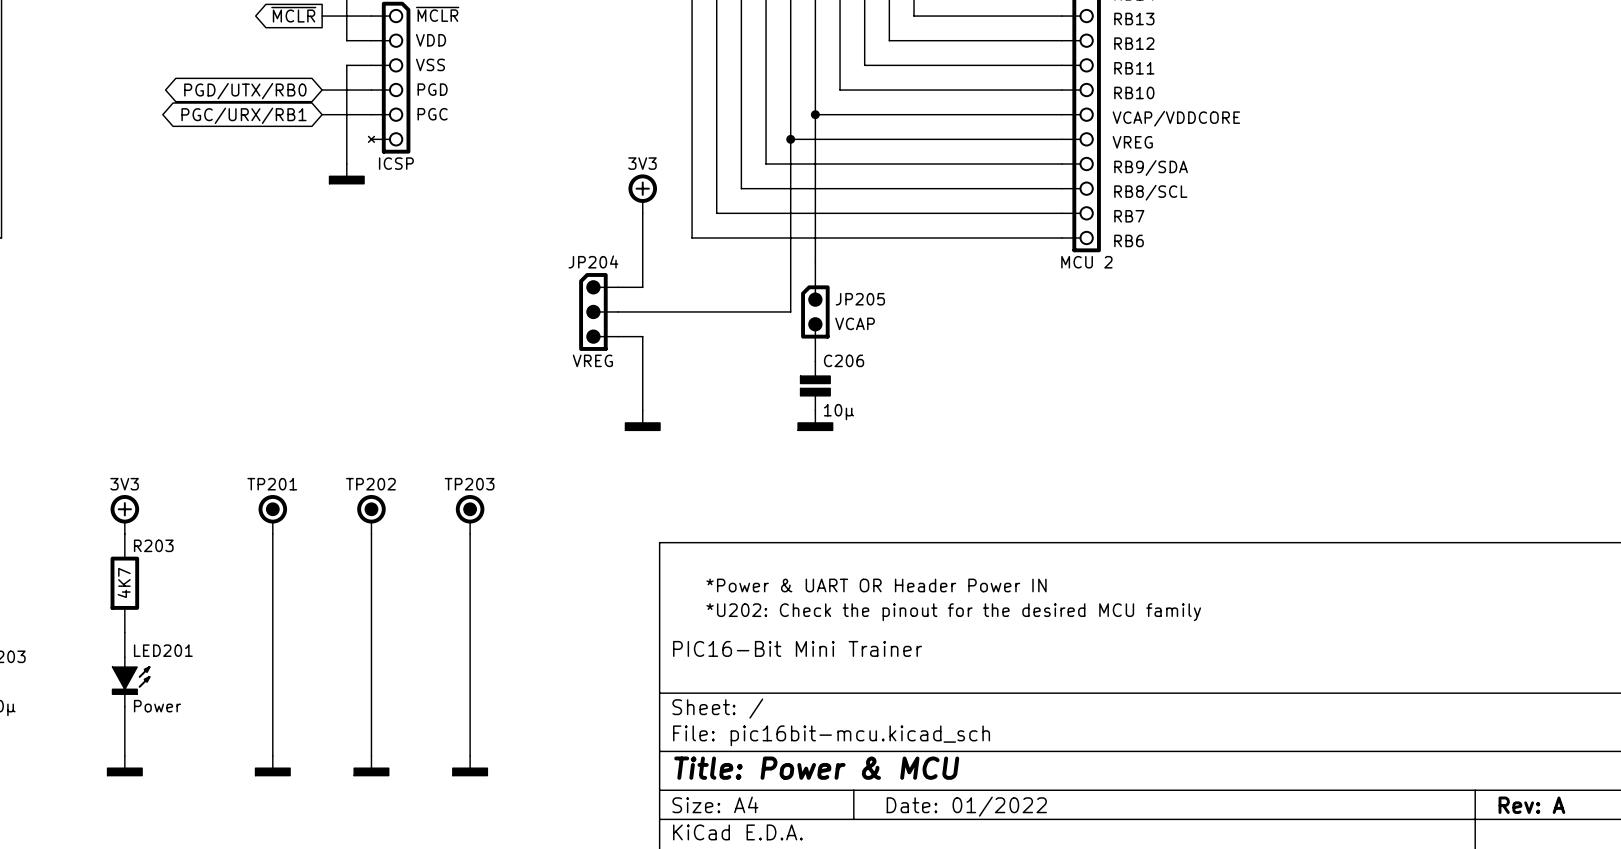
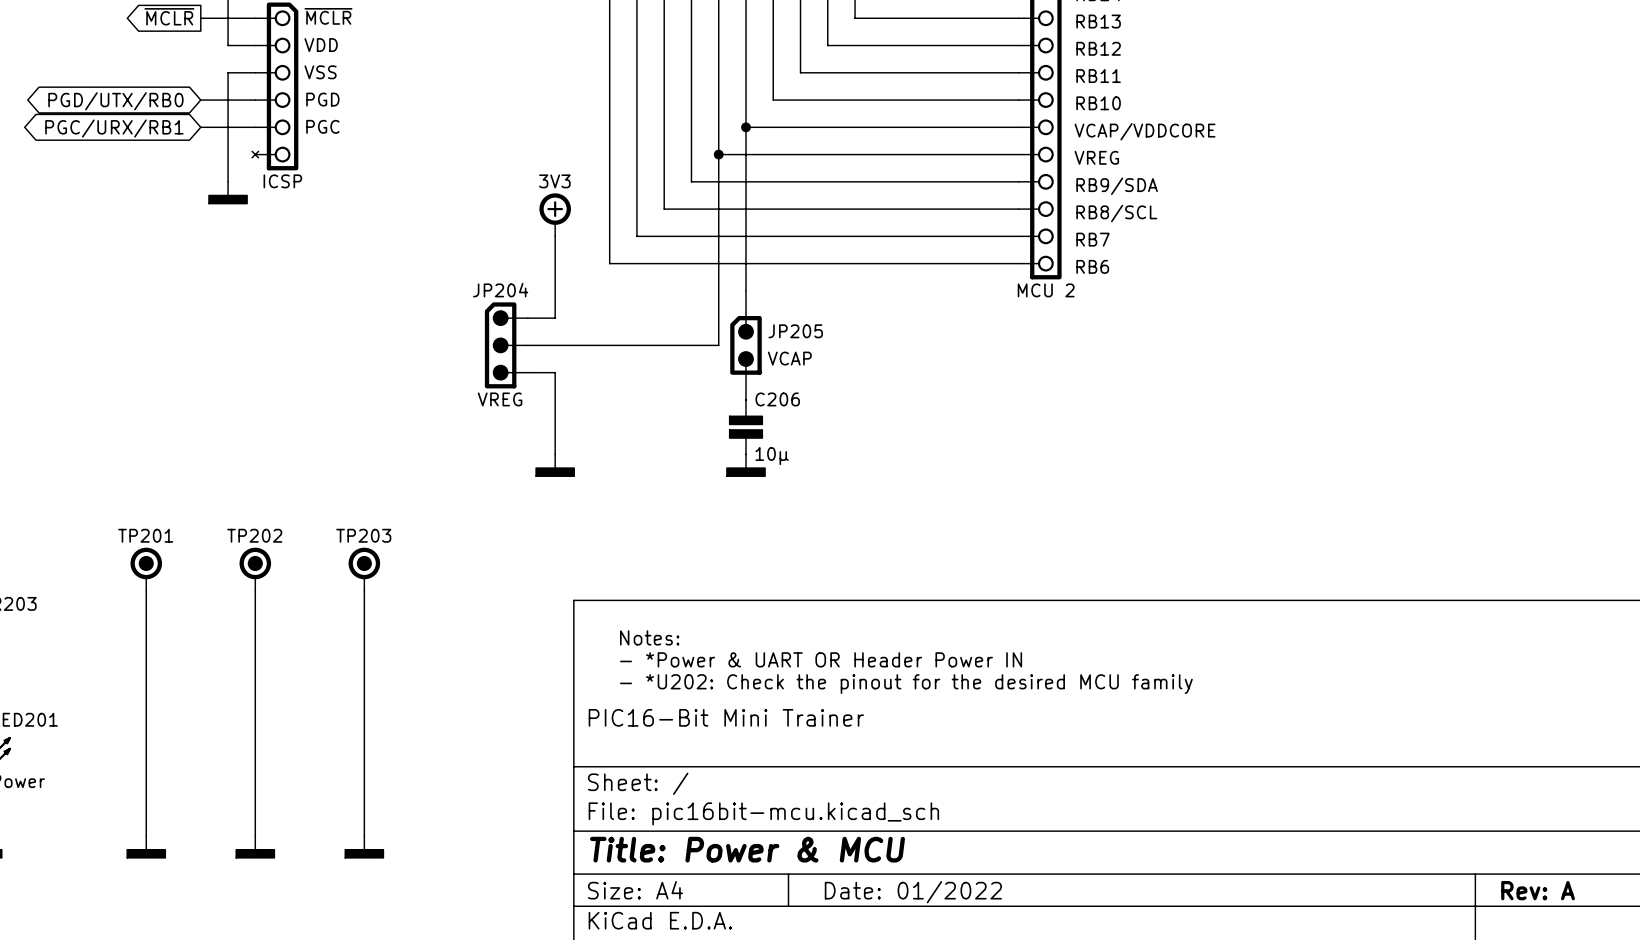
text: none -> Notes: (649, 637)
text: *Power & UART OR Header Power IN (876, 585) -> - *Power & UART OR Header Power IN (821, 659)
text: *U202: Check the pinout for the desired MCU family (953, 612) -> - *U202: Check the pinout for the desired MCU family (906, 684)

